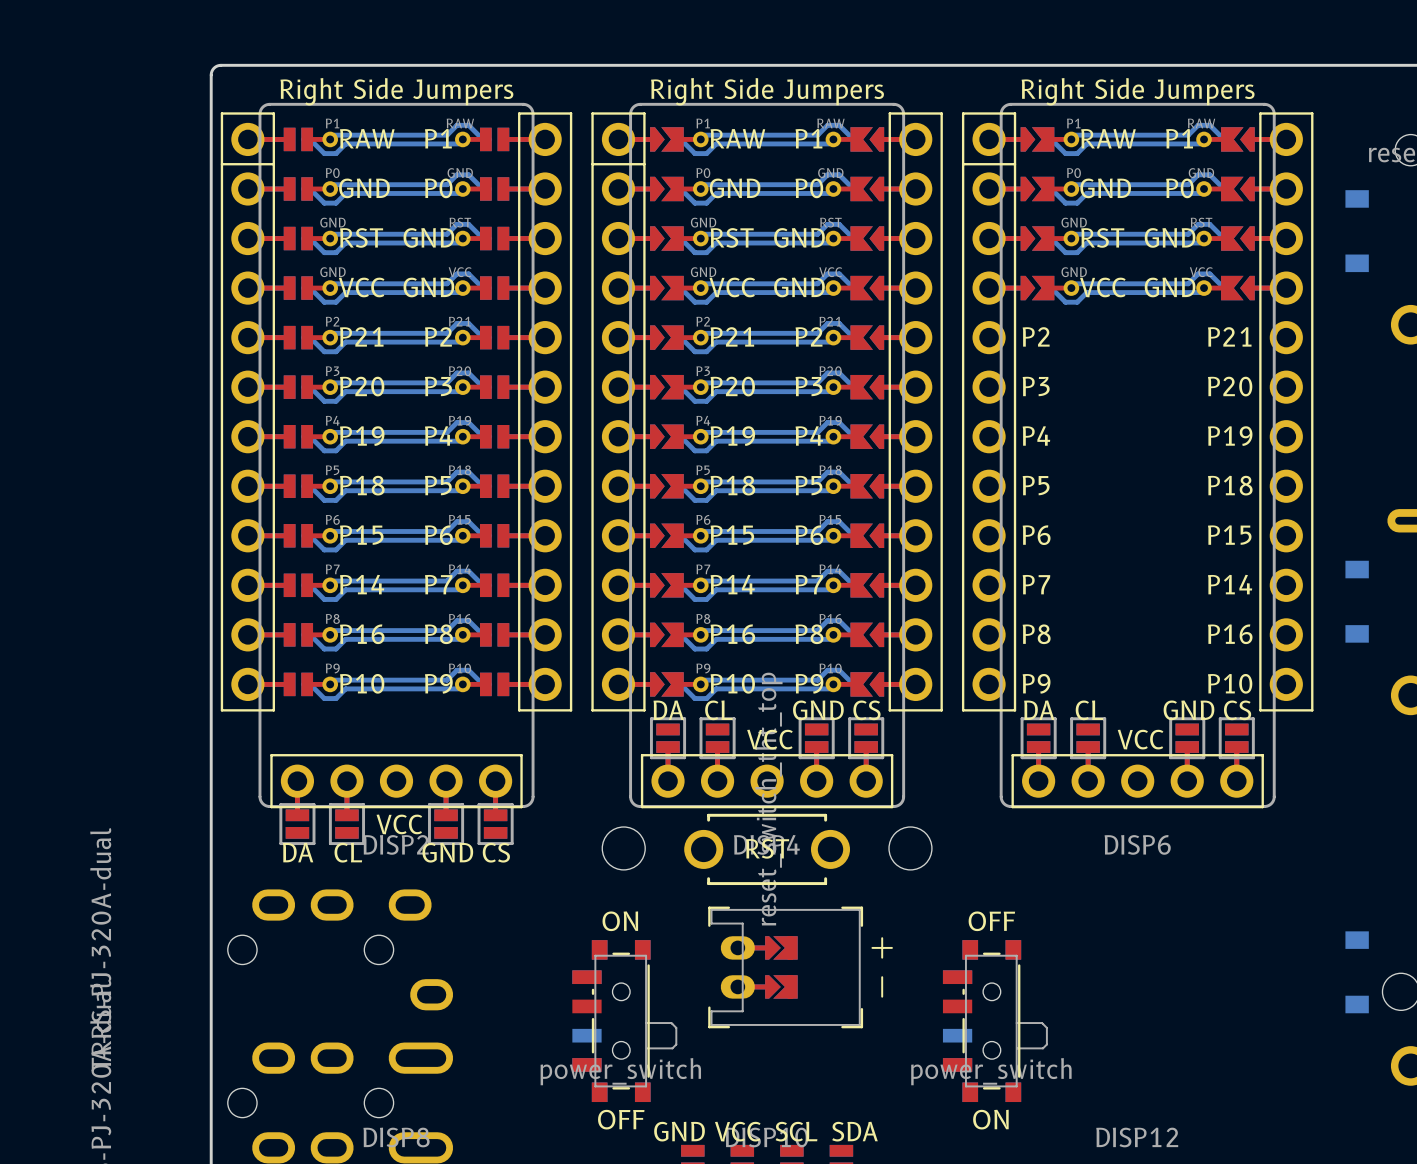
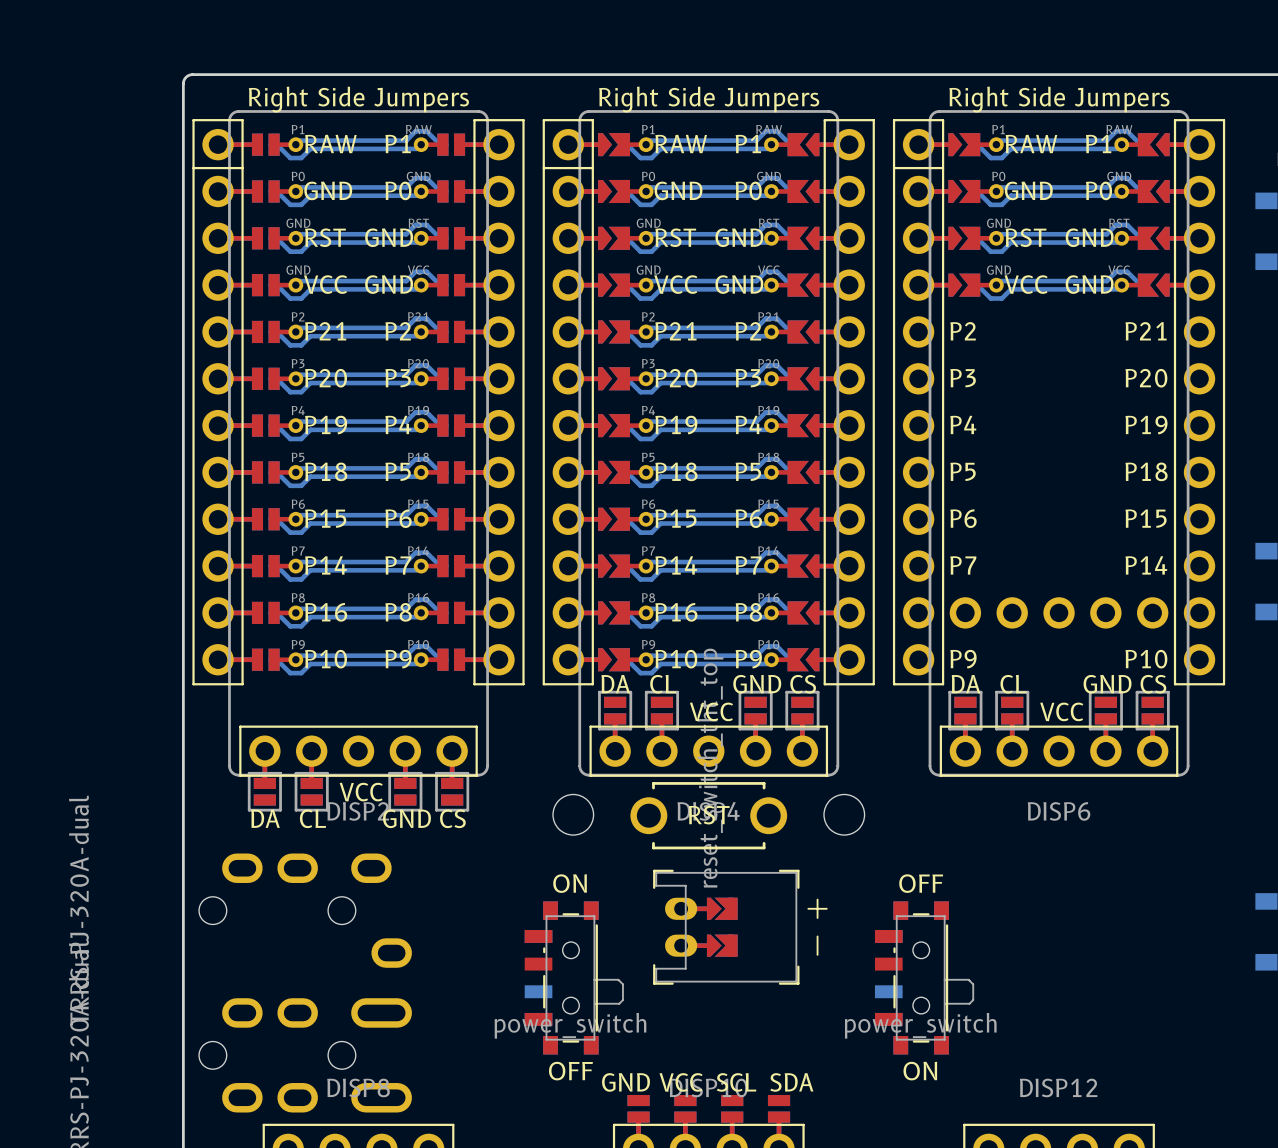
part footprint: [961, 112, 1314, 712] -> [892, 119, 1226, 686]

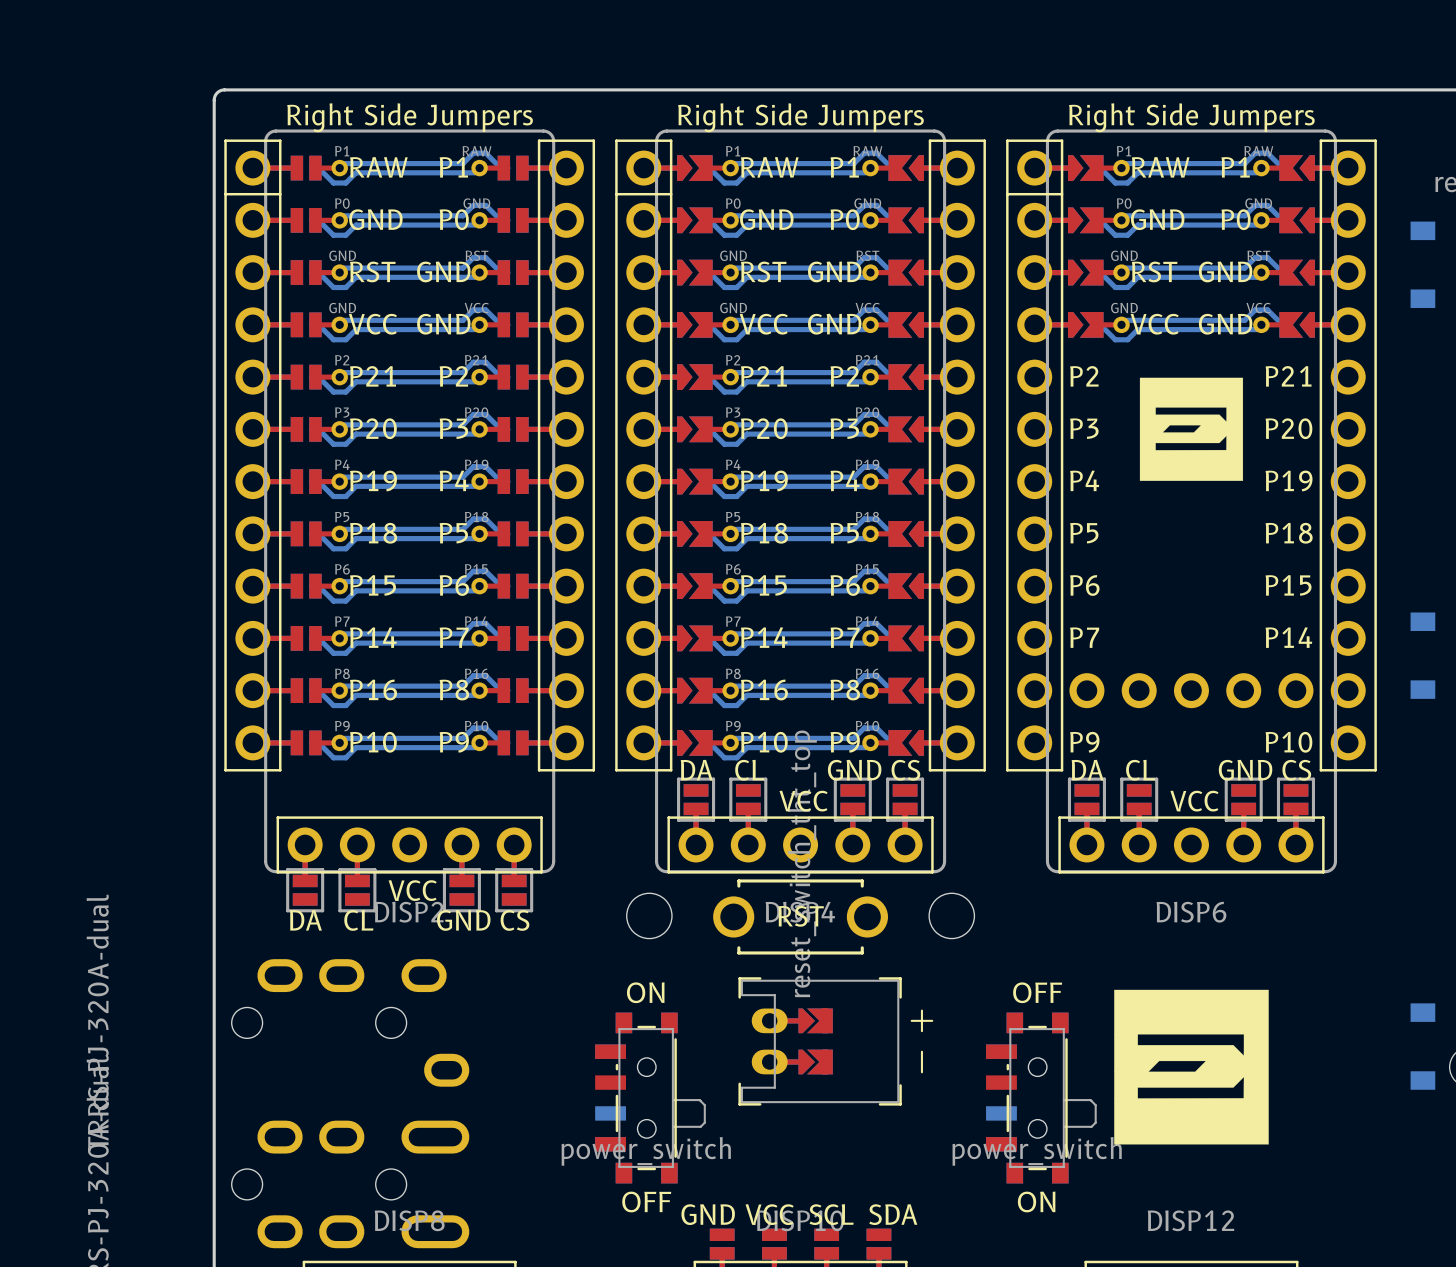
drawing: none -> [1139, 377, 1244, 481]
drawing: none -> [1114, 989, 1269, 1145]

